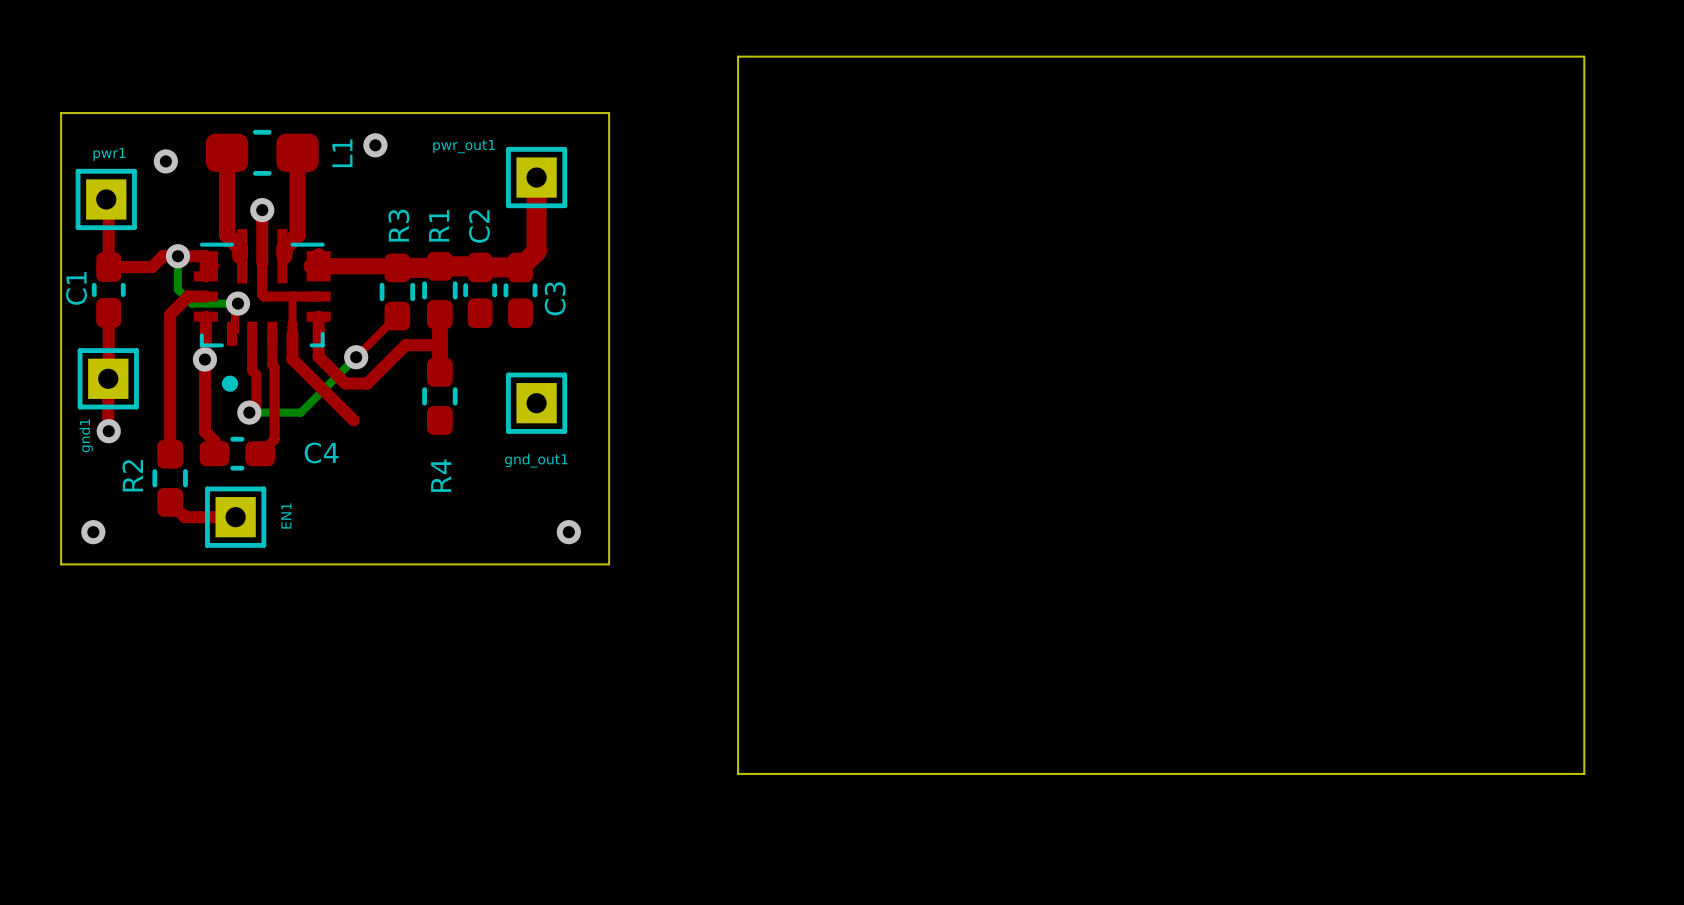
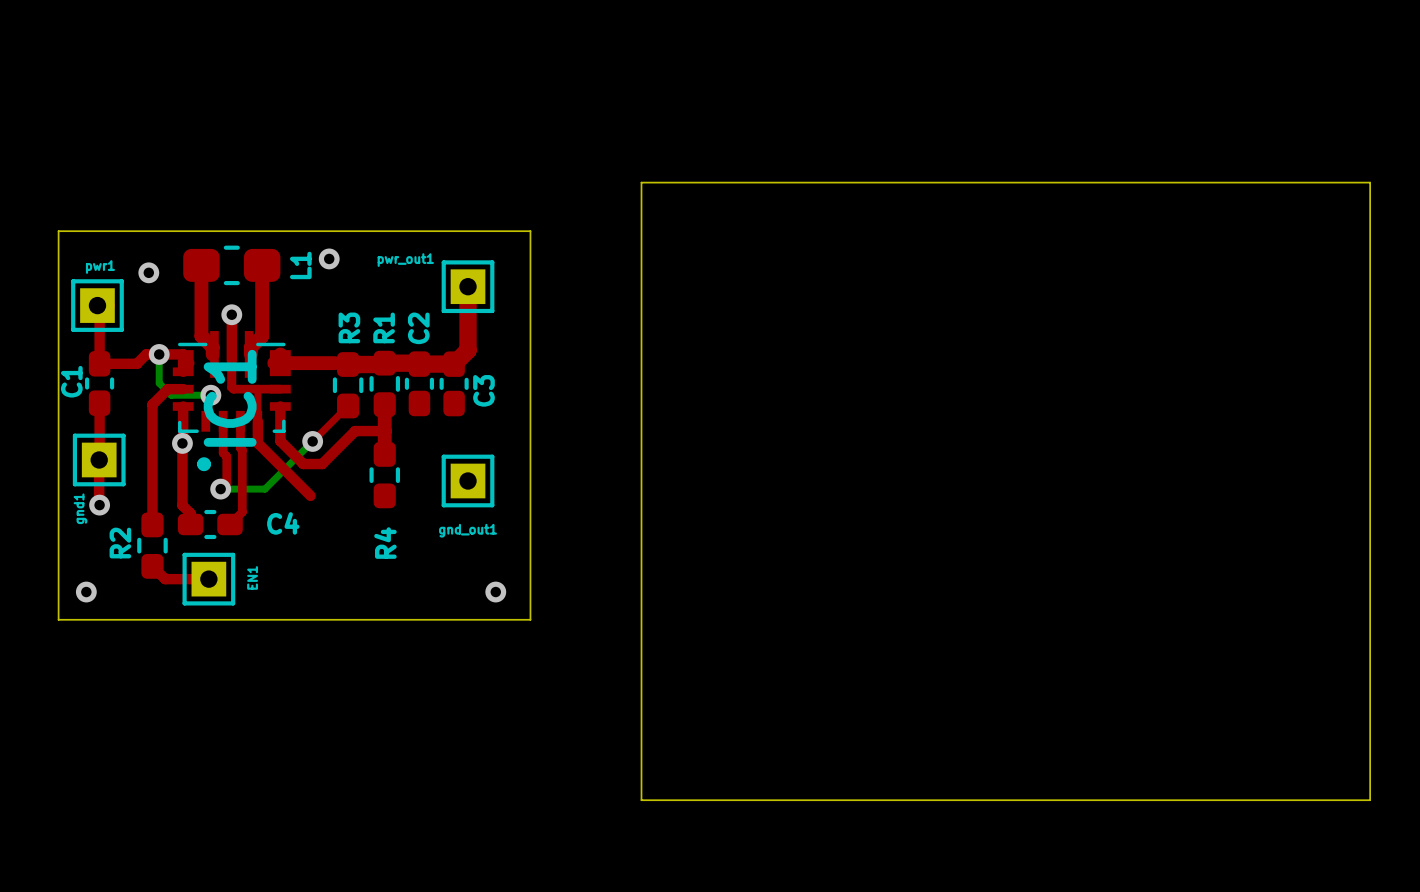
IC1 name: none -> IC1 (230, 398)

